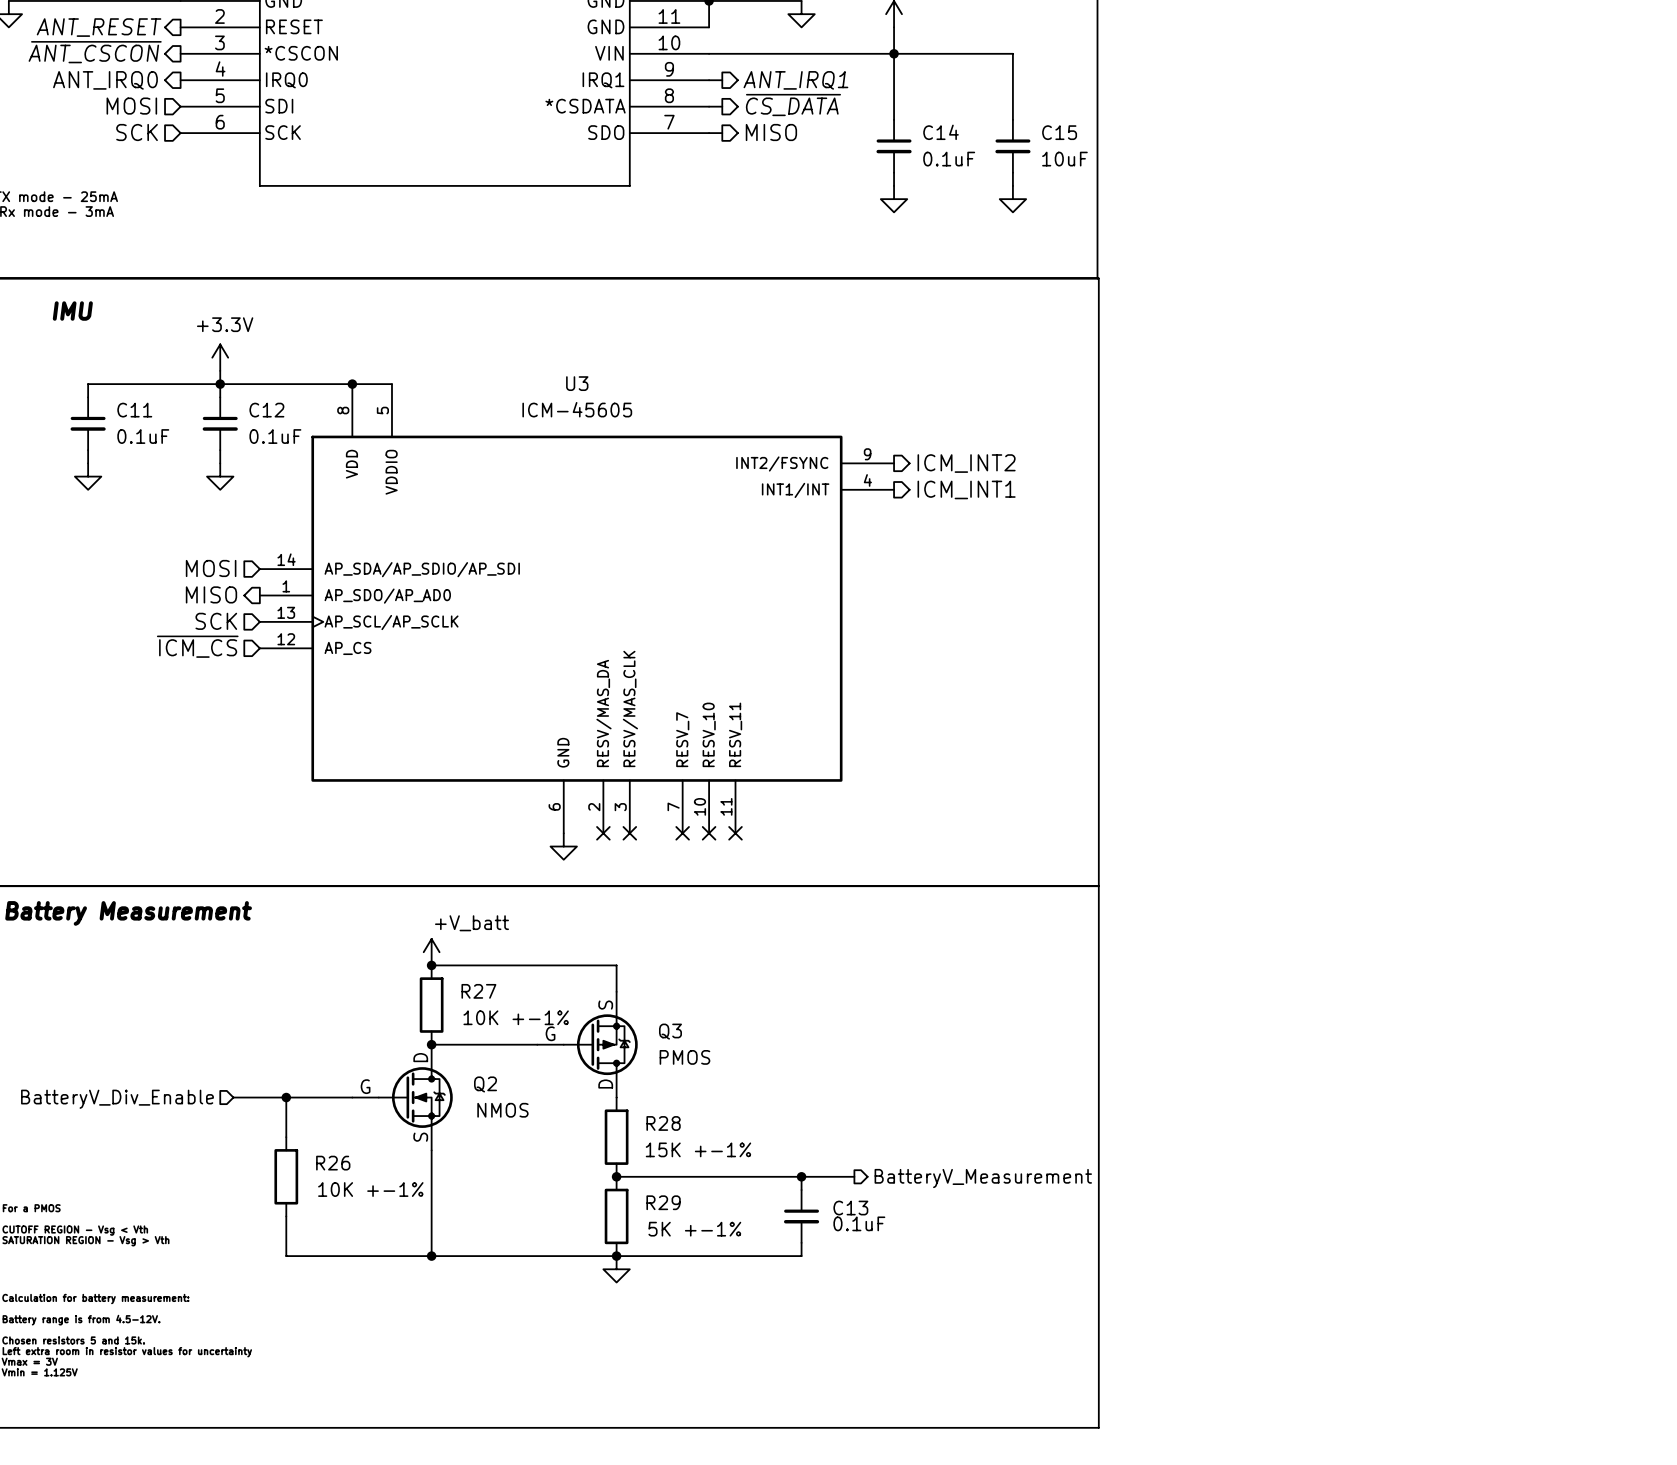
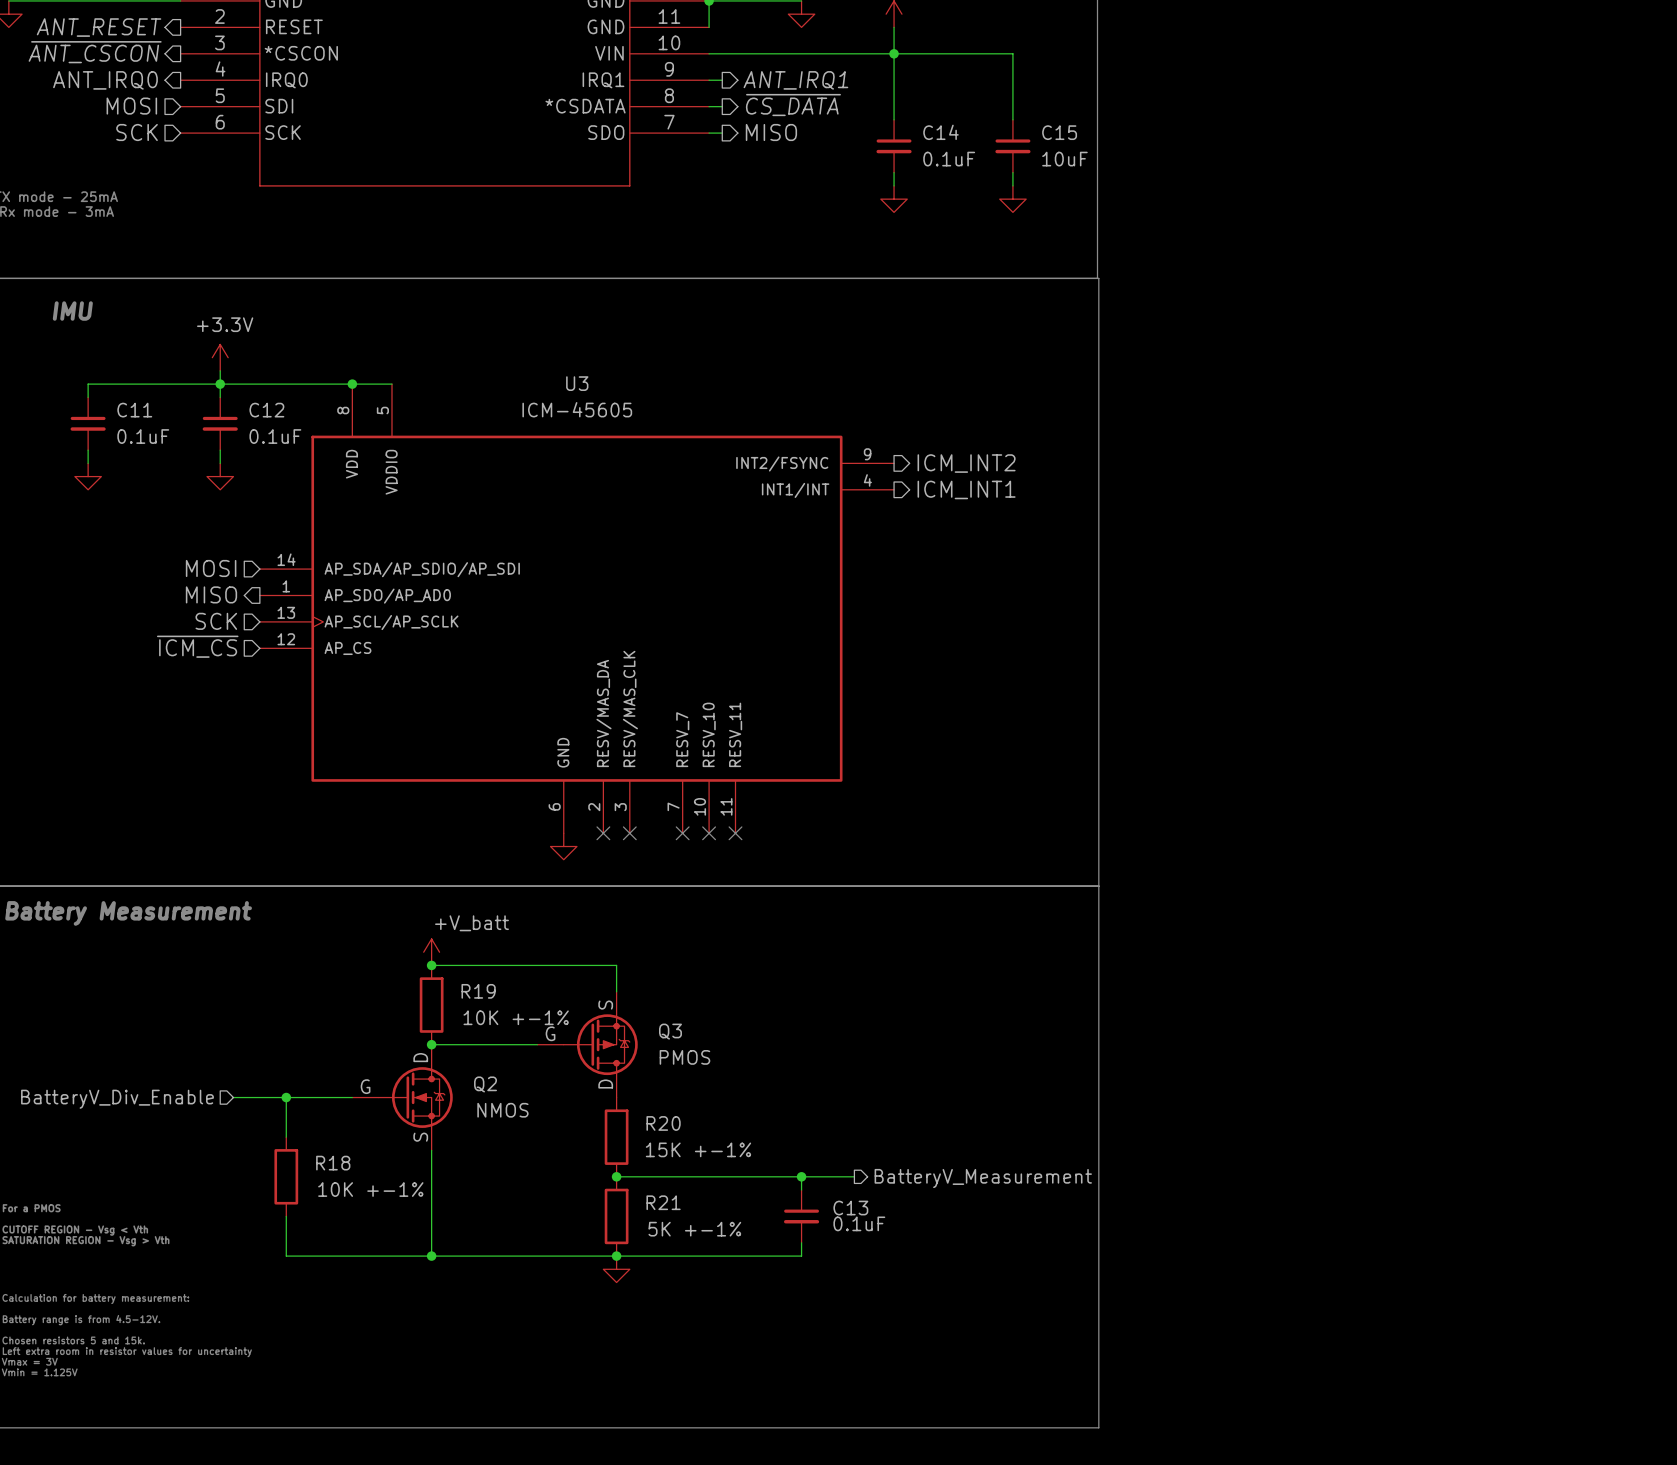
R27 name: R27 (478, 991) -> R19 (478, 991)
R28 name: R28 (663, 1123) -> R20 (663, 1123)
R26 name: R26 (333, 1163) -> R18 (333, 1163)
R29 name: R29 (663, 1202) -> R21 (663, 1202)

